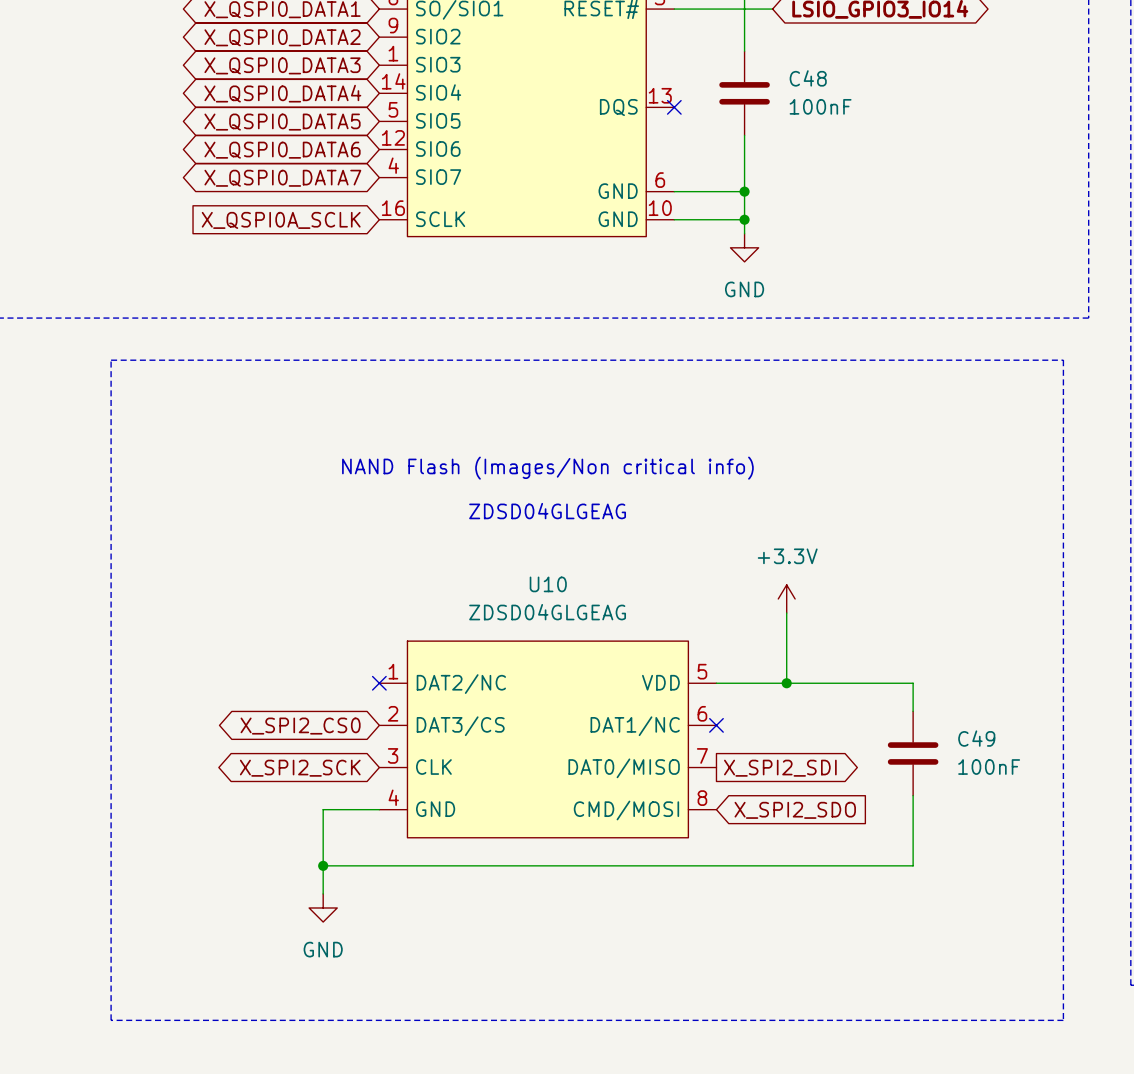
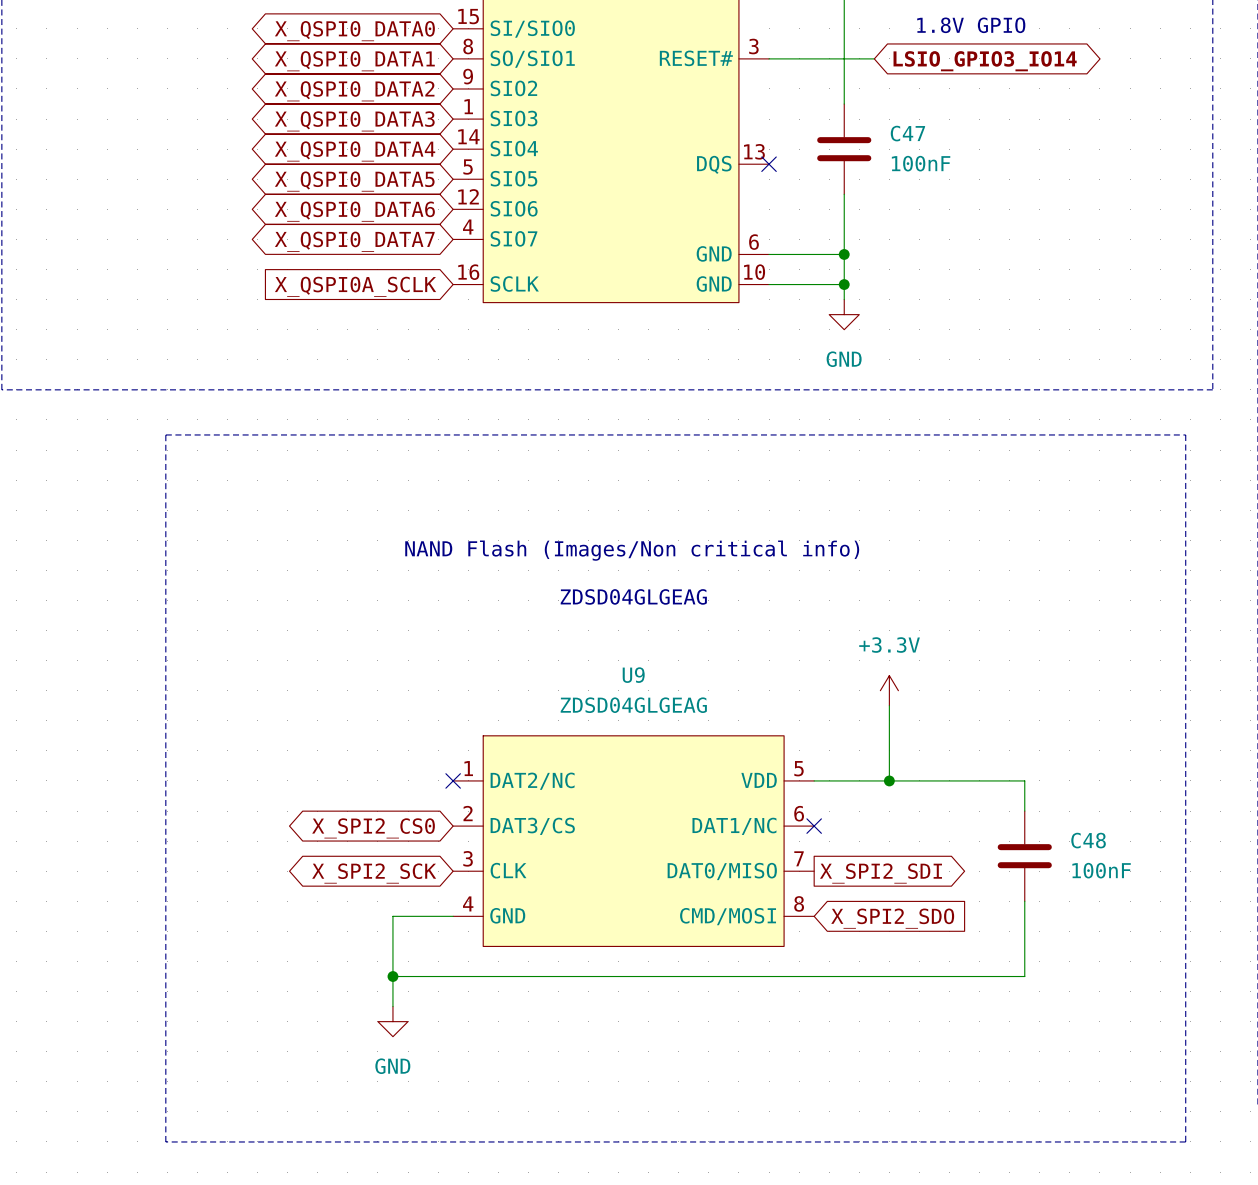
C48 name: C48 (808, 78) -> C47 (907, 133)
U10 name: U10 (548, 584) -> U9 (633, 675)
C49 name: C49 (976, 738) -> C48 (1088, 840)

